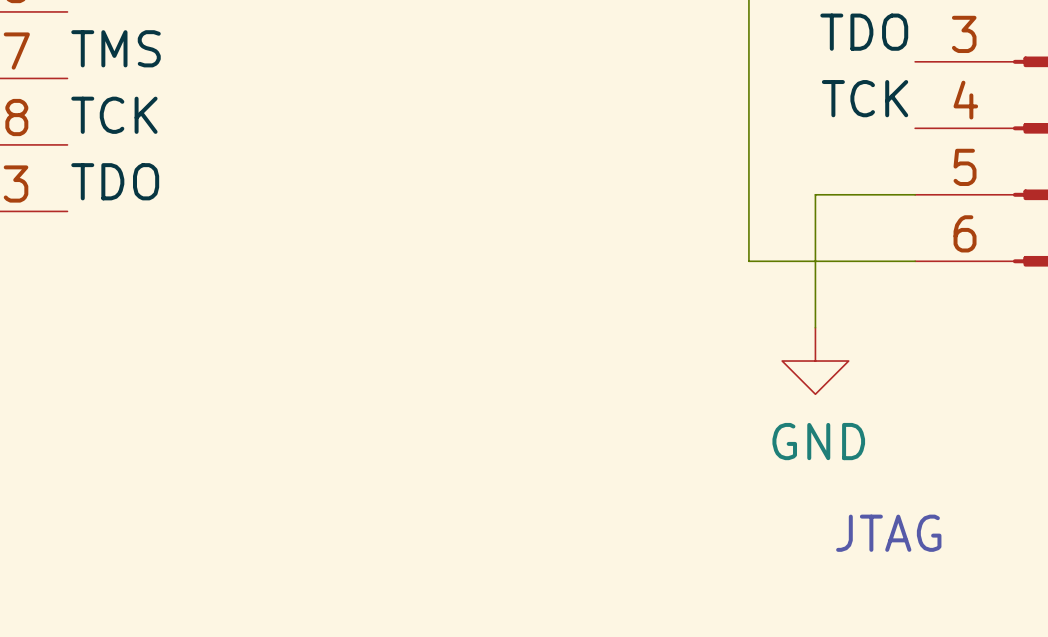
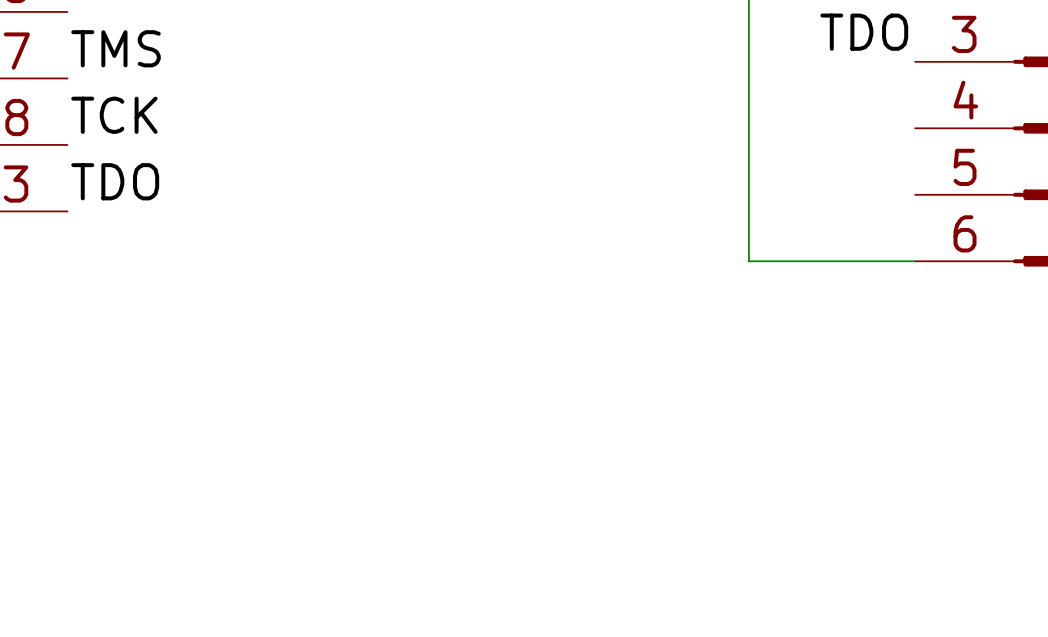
label: TCK (865, 98) -> none
wire: (915, 194) (815, 194) (815, 327) -> none
power symbol: GND (815, 361) -> none
text: JTAG (888, 533) -> none

